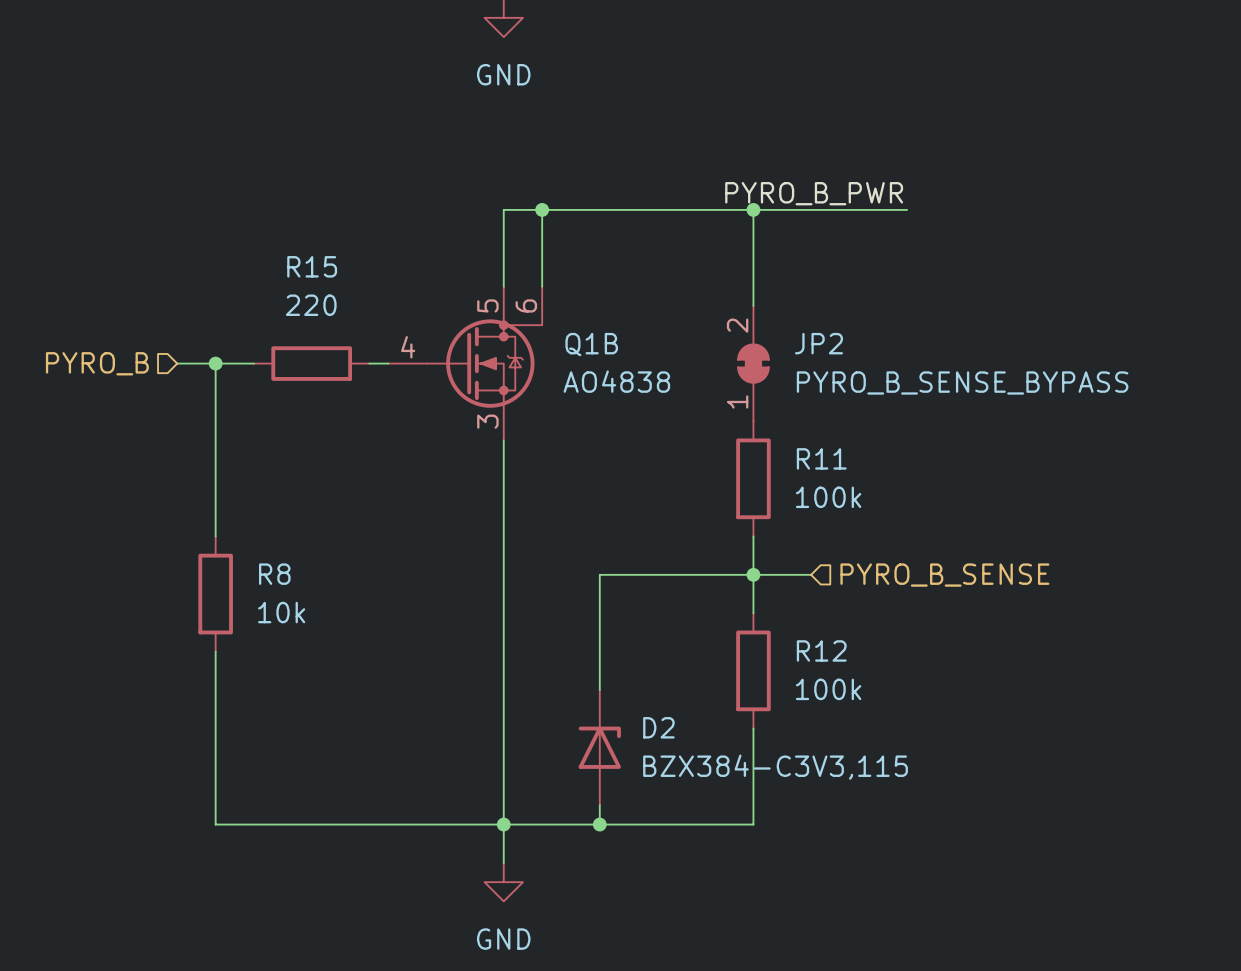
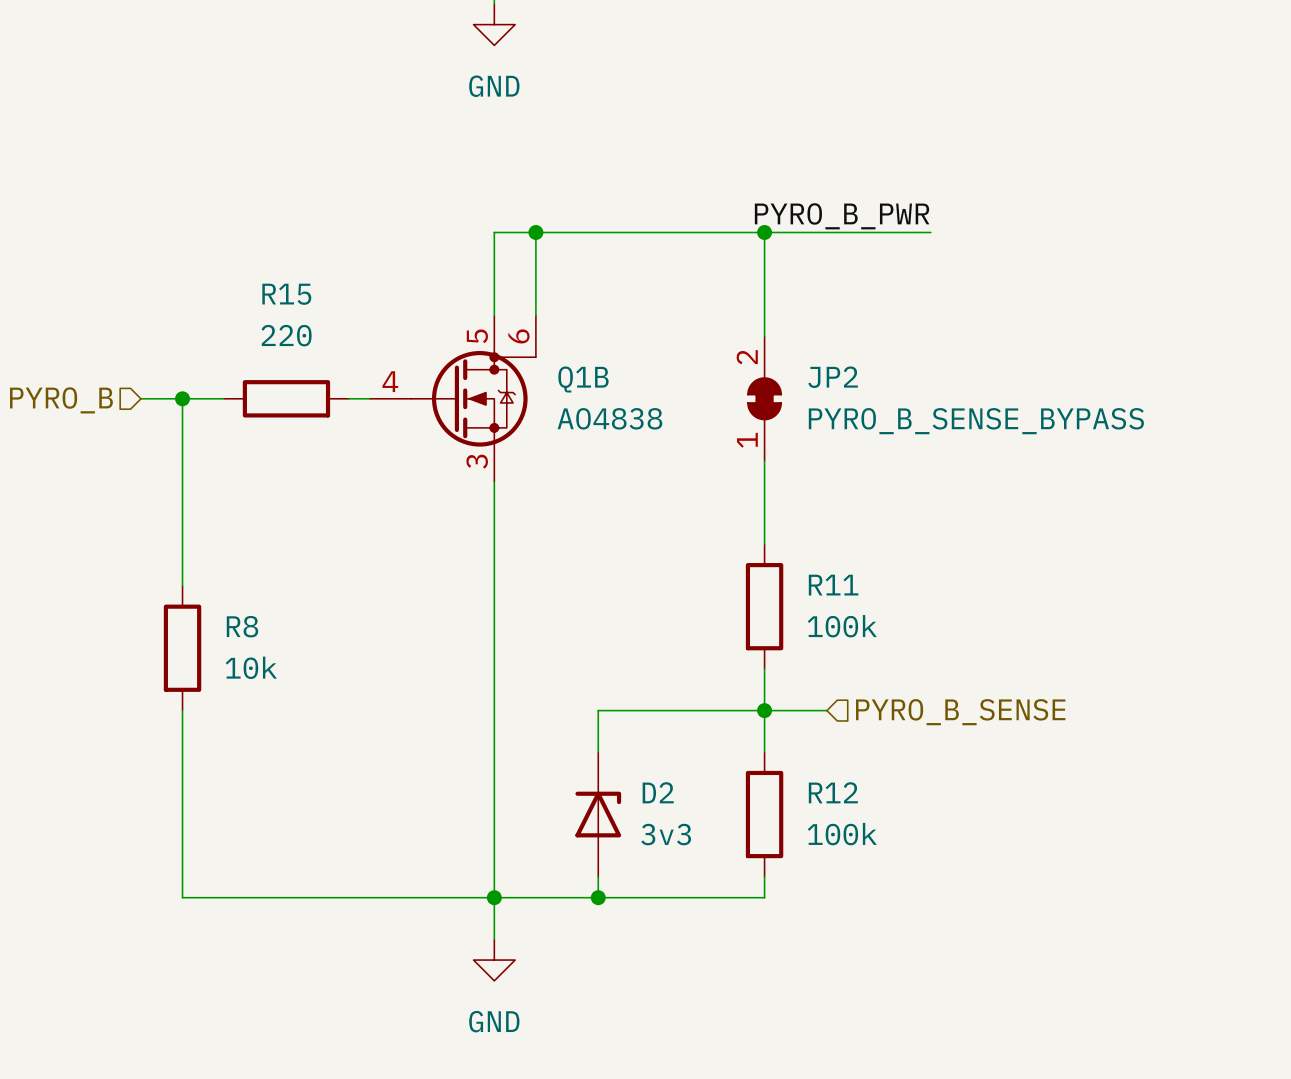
R11 position: (753, 478) -> (764, 606)
wire: (753, 536) (753, 613) -> (764, 752) (764, 669)
junction position: (753, 574) -> (764, 710)
wire: (811, 574) (599, 574) (599, 651) -> (826, 710) (598, 710)
hierarchical label position: PYRO_B_SENSE (944, 575) -> PYRO_B_SENSE (960, 712)
R12 position: (753, 670) -> (764, 814)
wire: (753, 728) (753, 805) -> (764, 461) (764, 544)
D2 value: BZX384-C3V3,115 (775, 767) -> 3v3 (666, 834)

